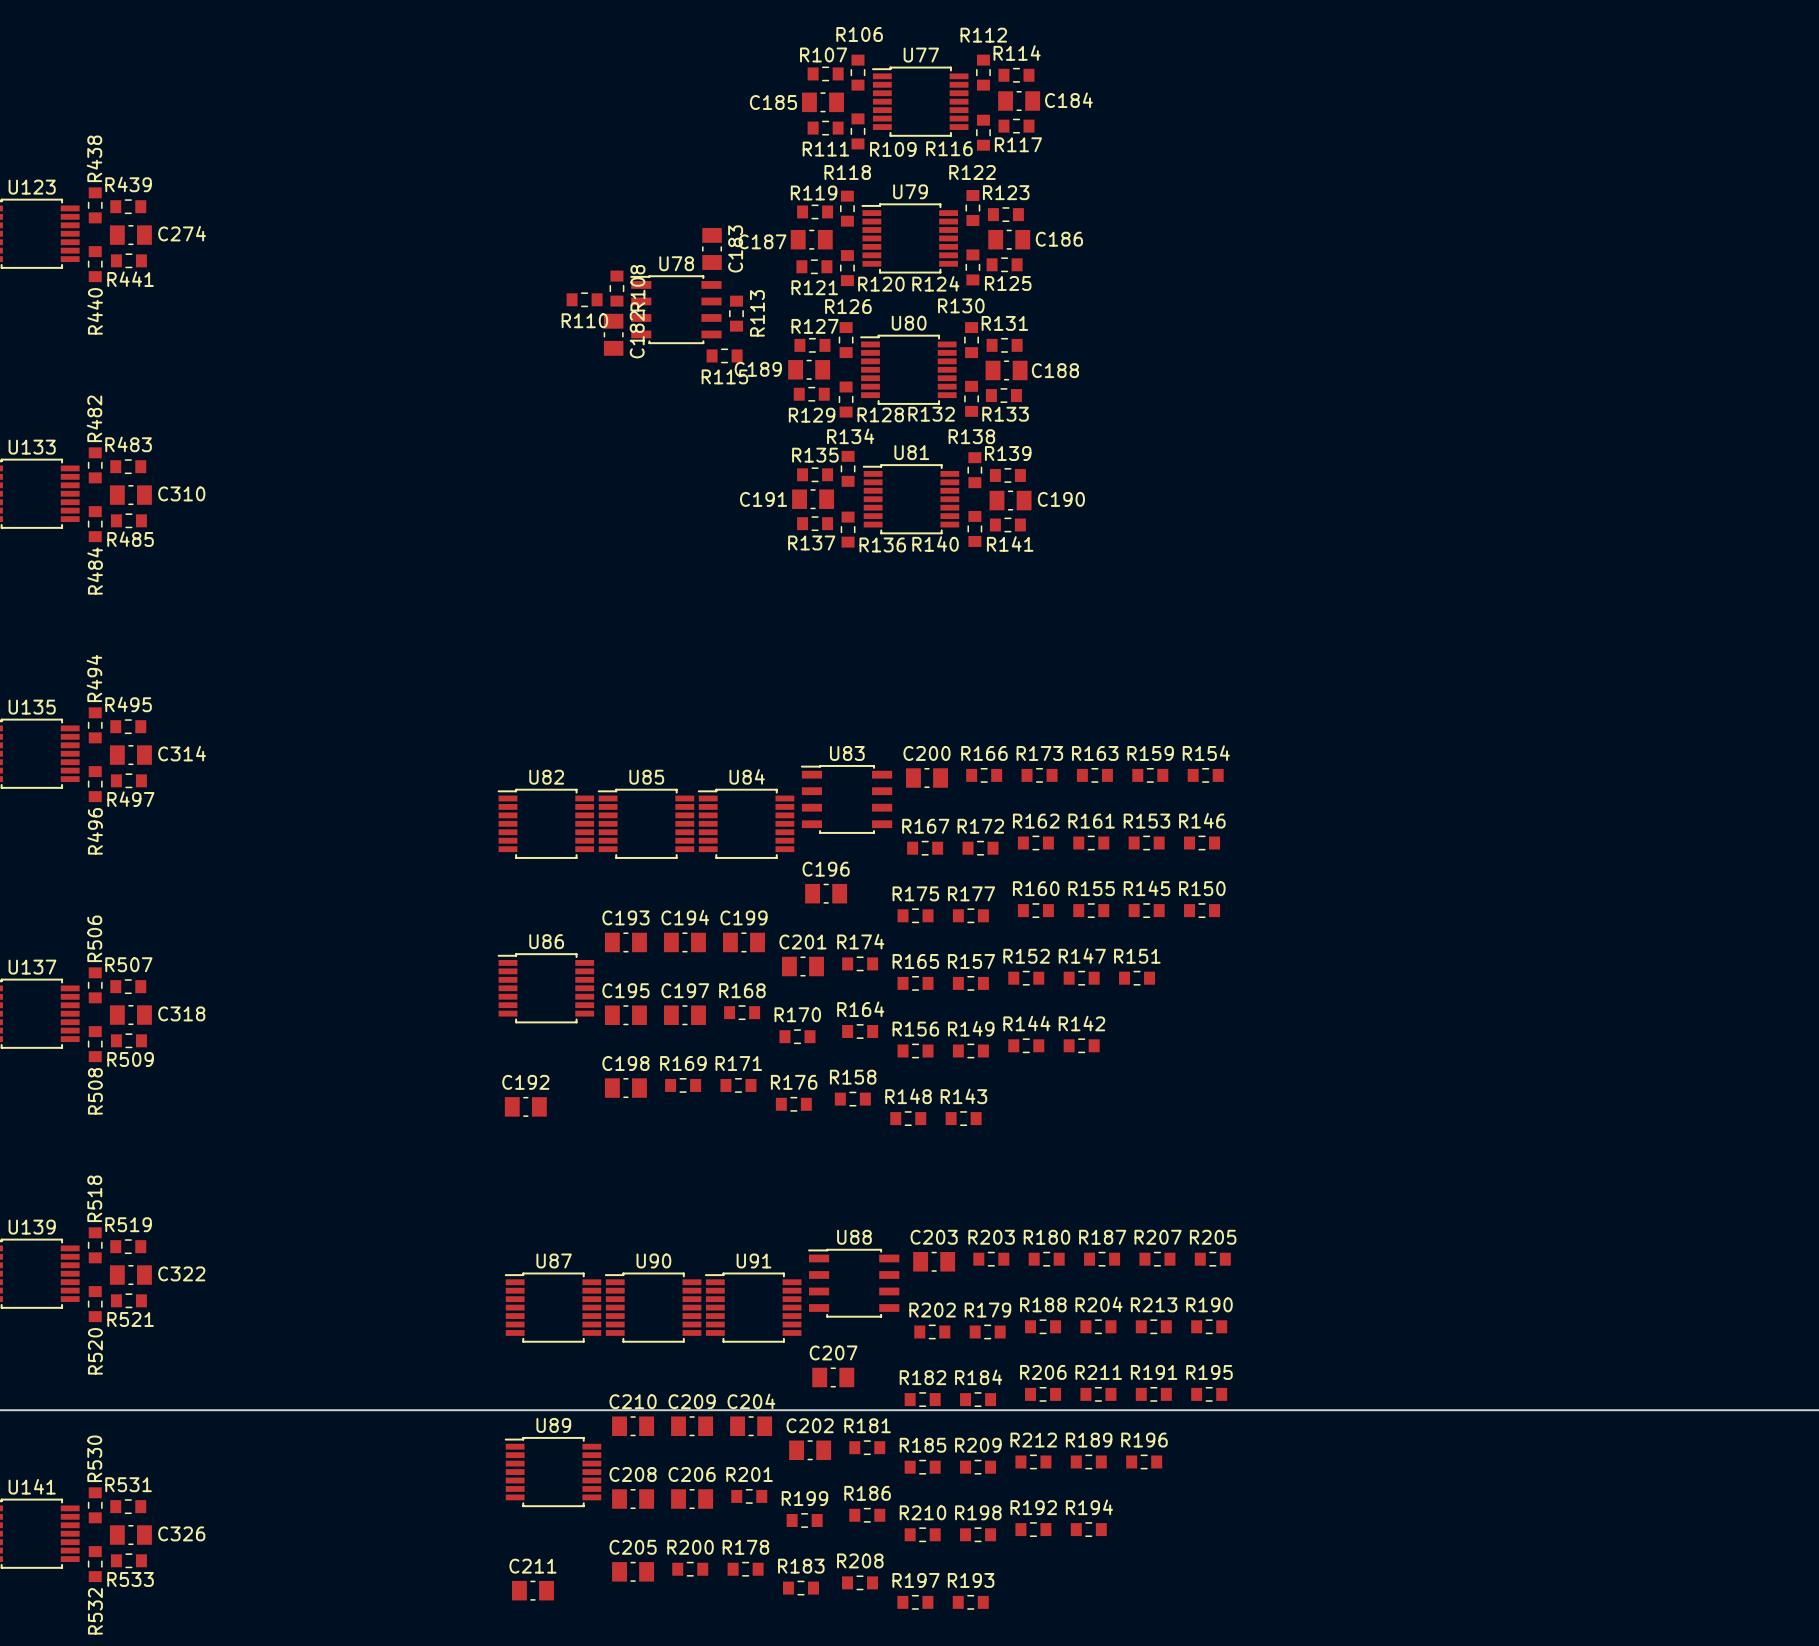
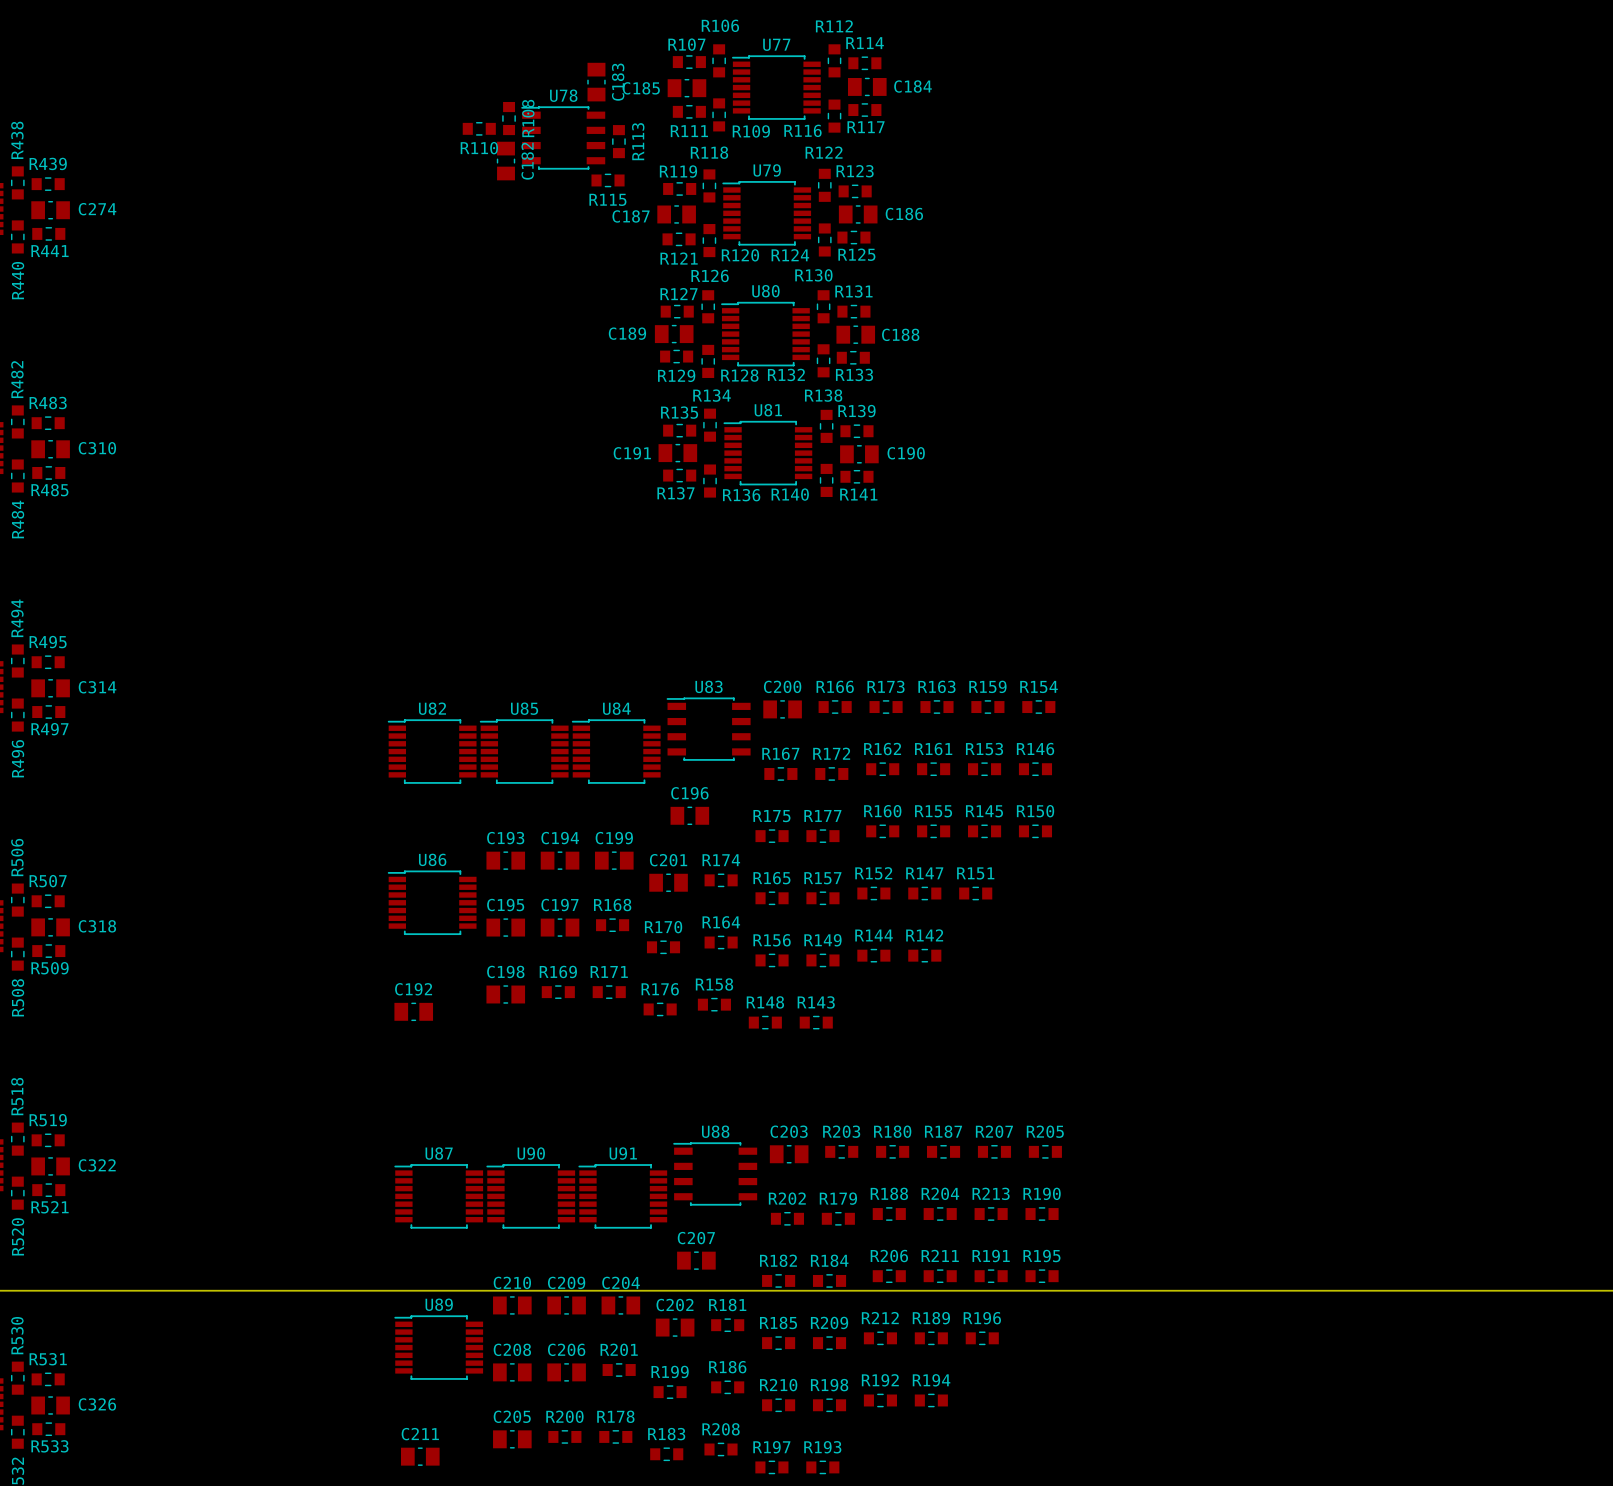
C183 position: (712, 248) -> (596, 82)
R108 position: (616, 288) -> (509, 118)
R110 position: (584, 299) -> (479, 128)
U78 position: (675, 309) -> (563, 137)
R113 position: (736, 313) -> (618, 141)
C182 position: (613, 334) -> (506, 161)
R115 position: (724, 355) -> (608, 180)

